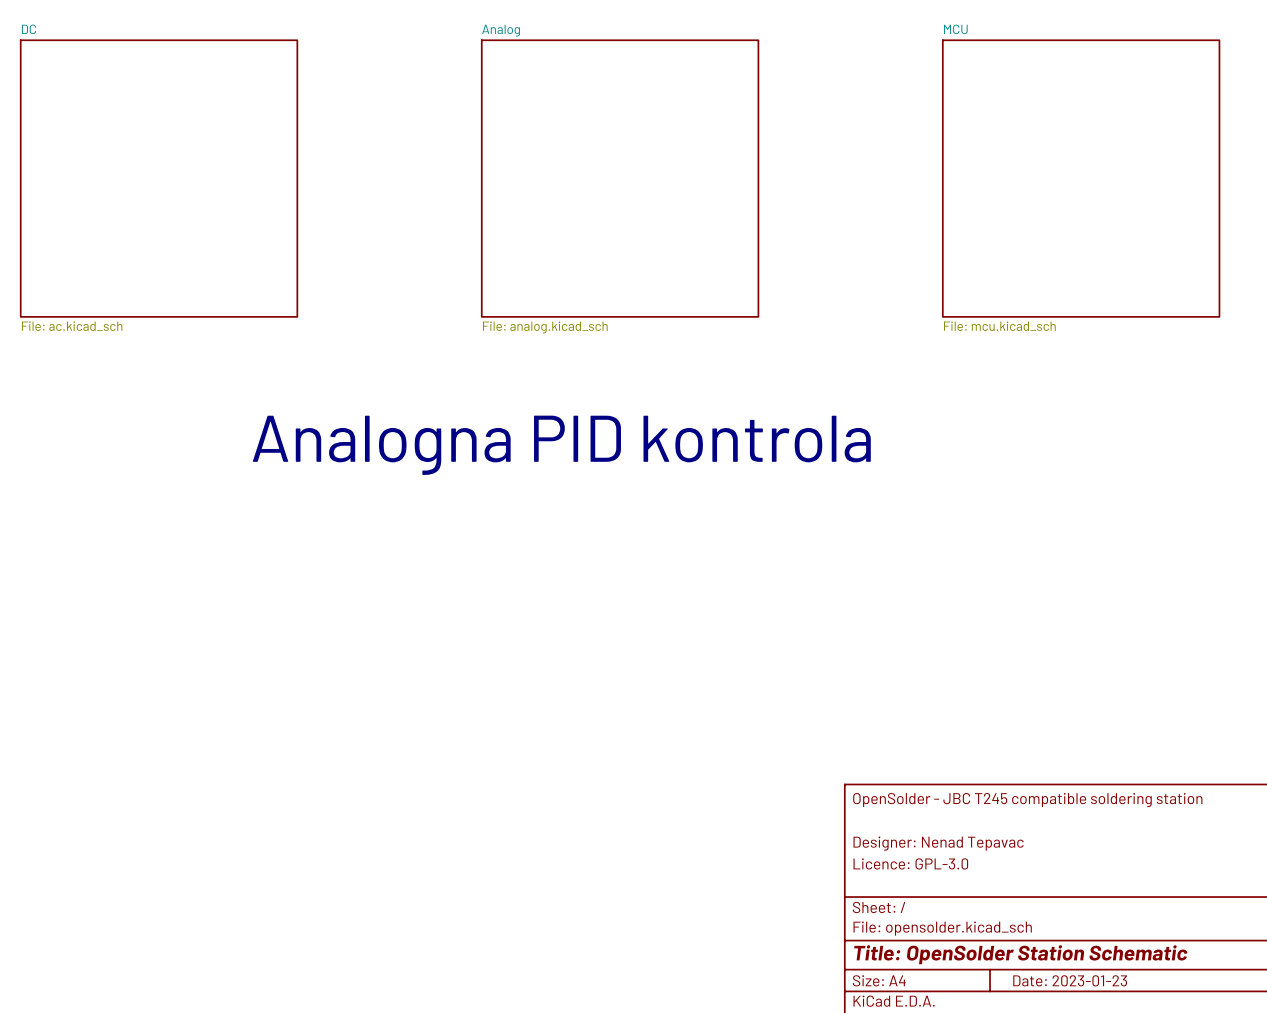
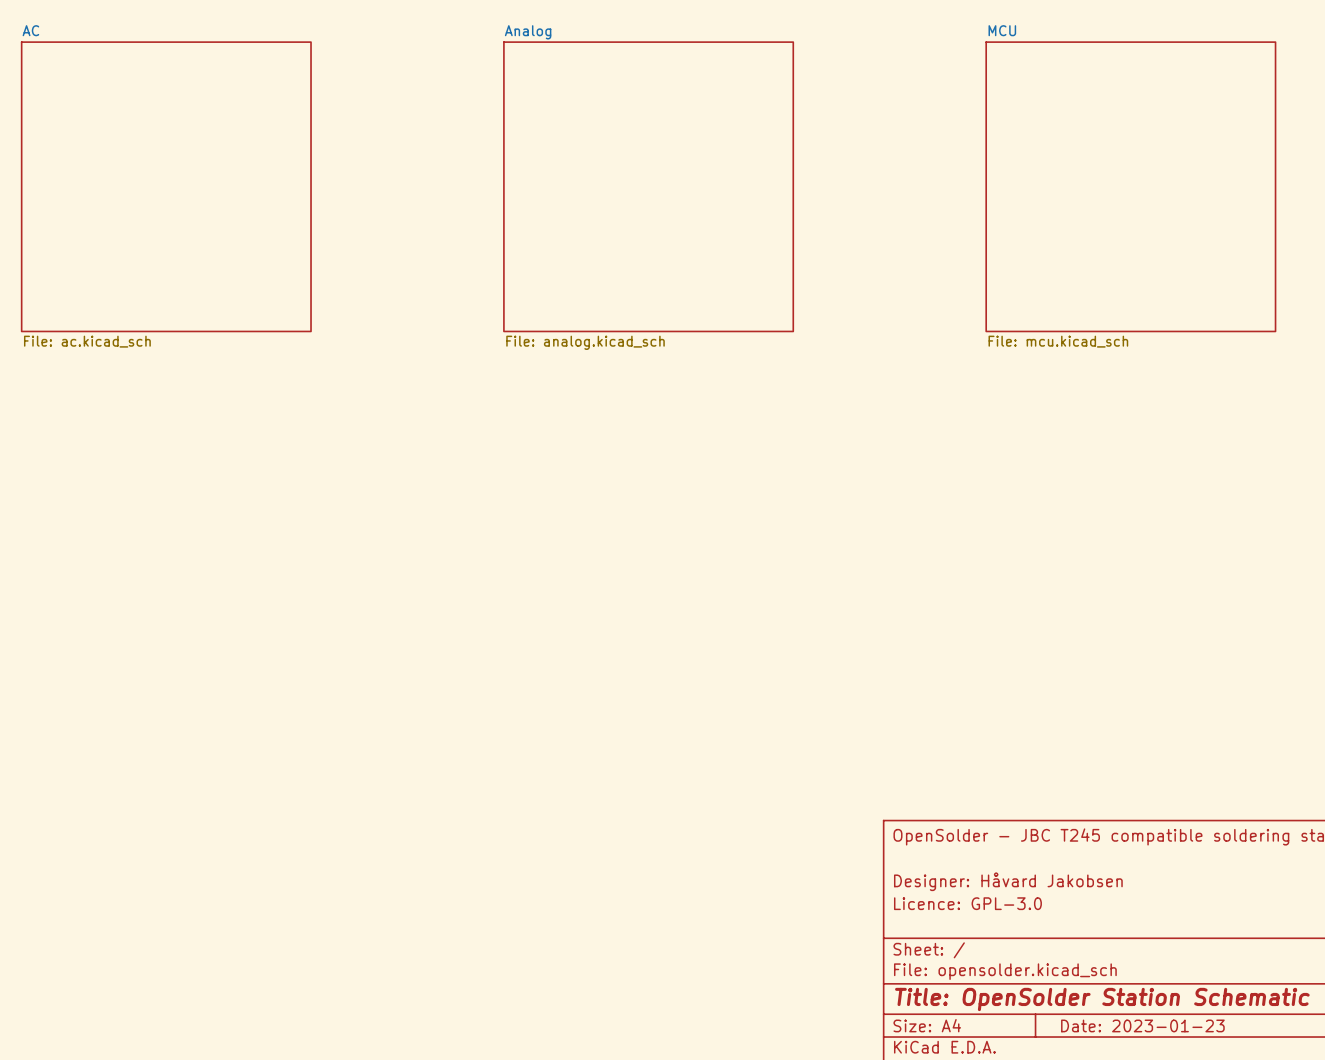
sheet DC name: DC (28, 29) -> AC (30, 30)
text: Analogna PID kontrola (561, 445) -> none
title block: Designer: Nenad Tepavac (938, 843) -> Designer: Håvard Jakobsen (1008, 881)

